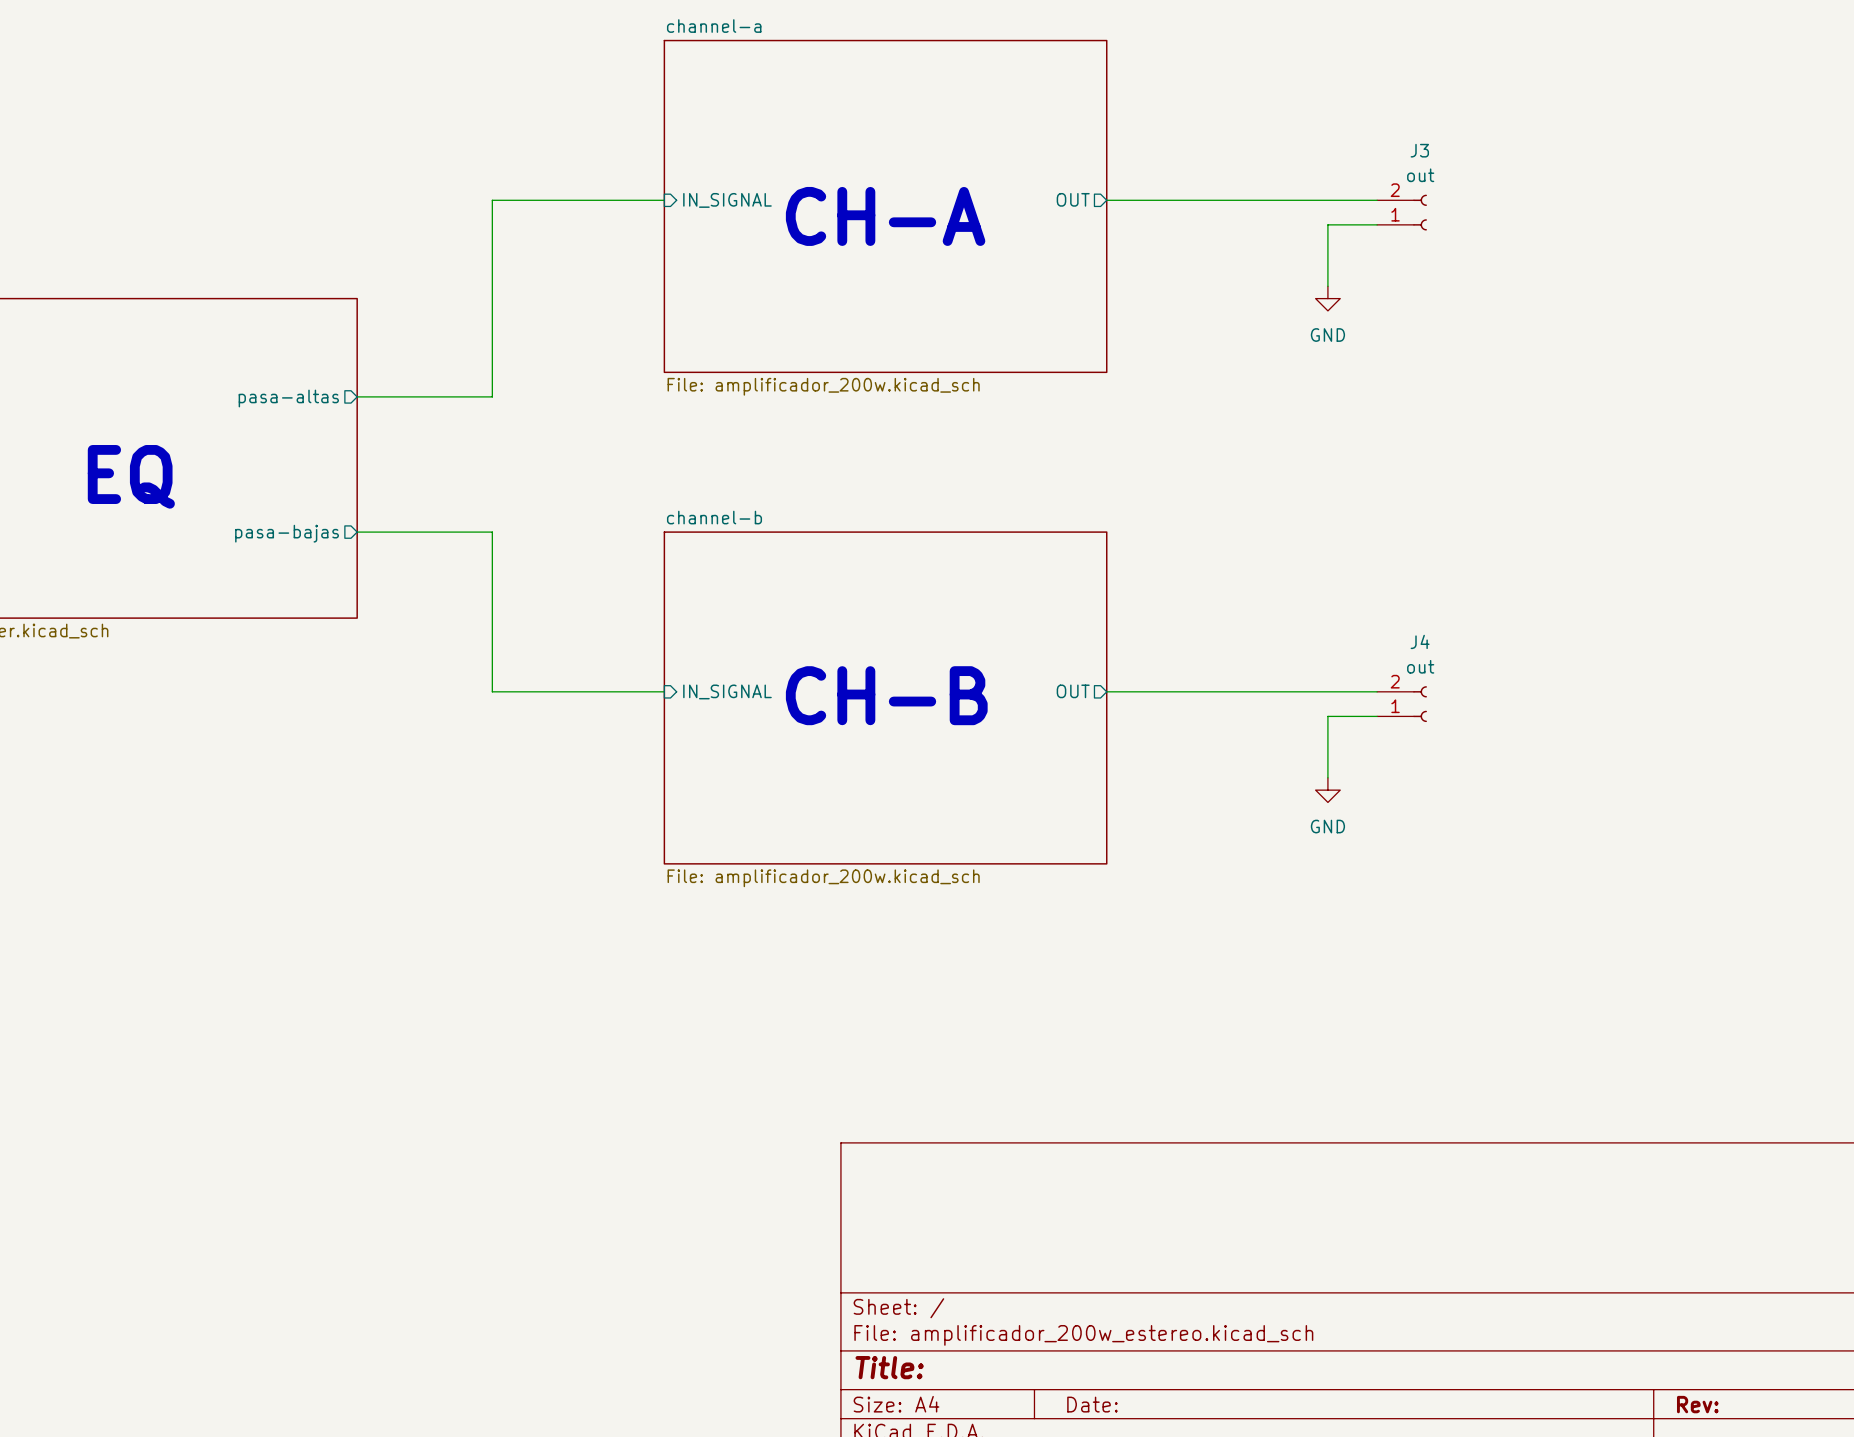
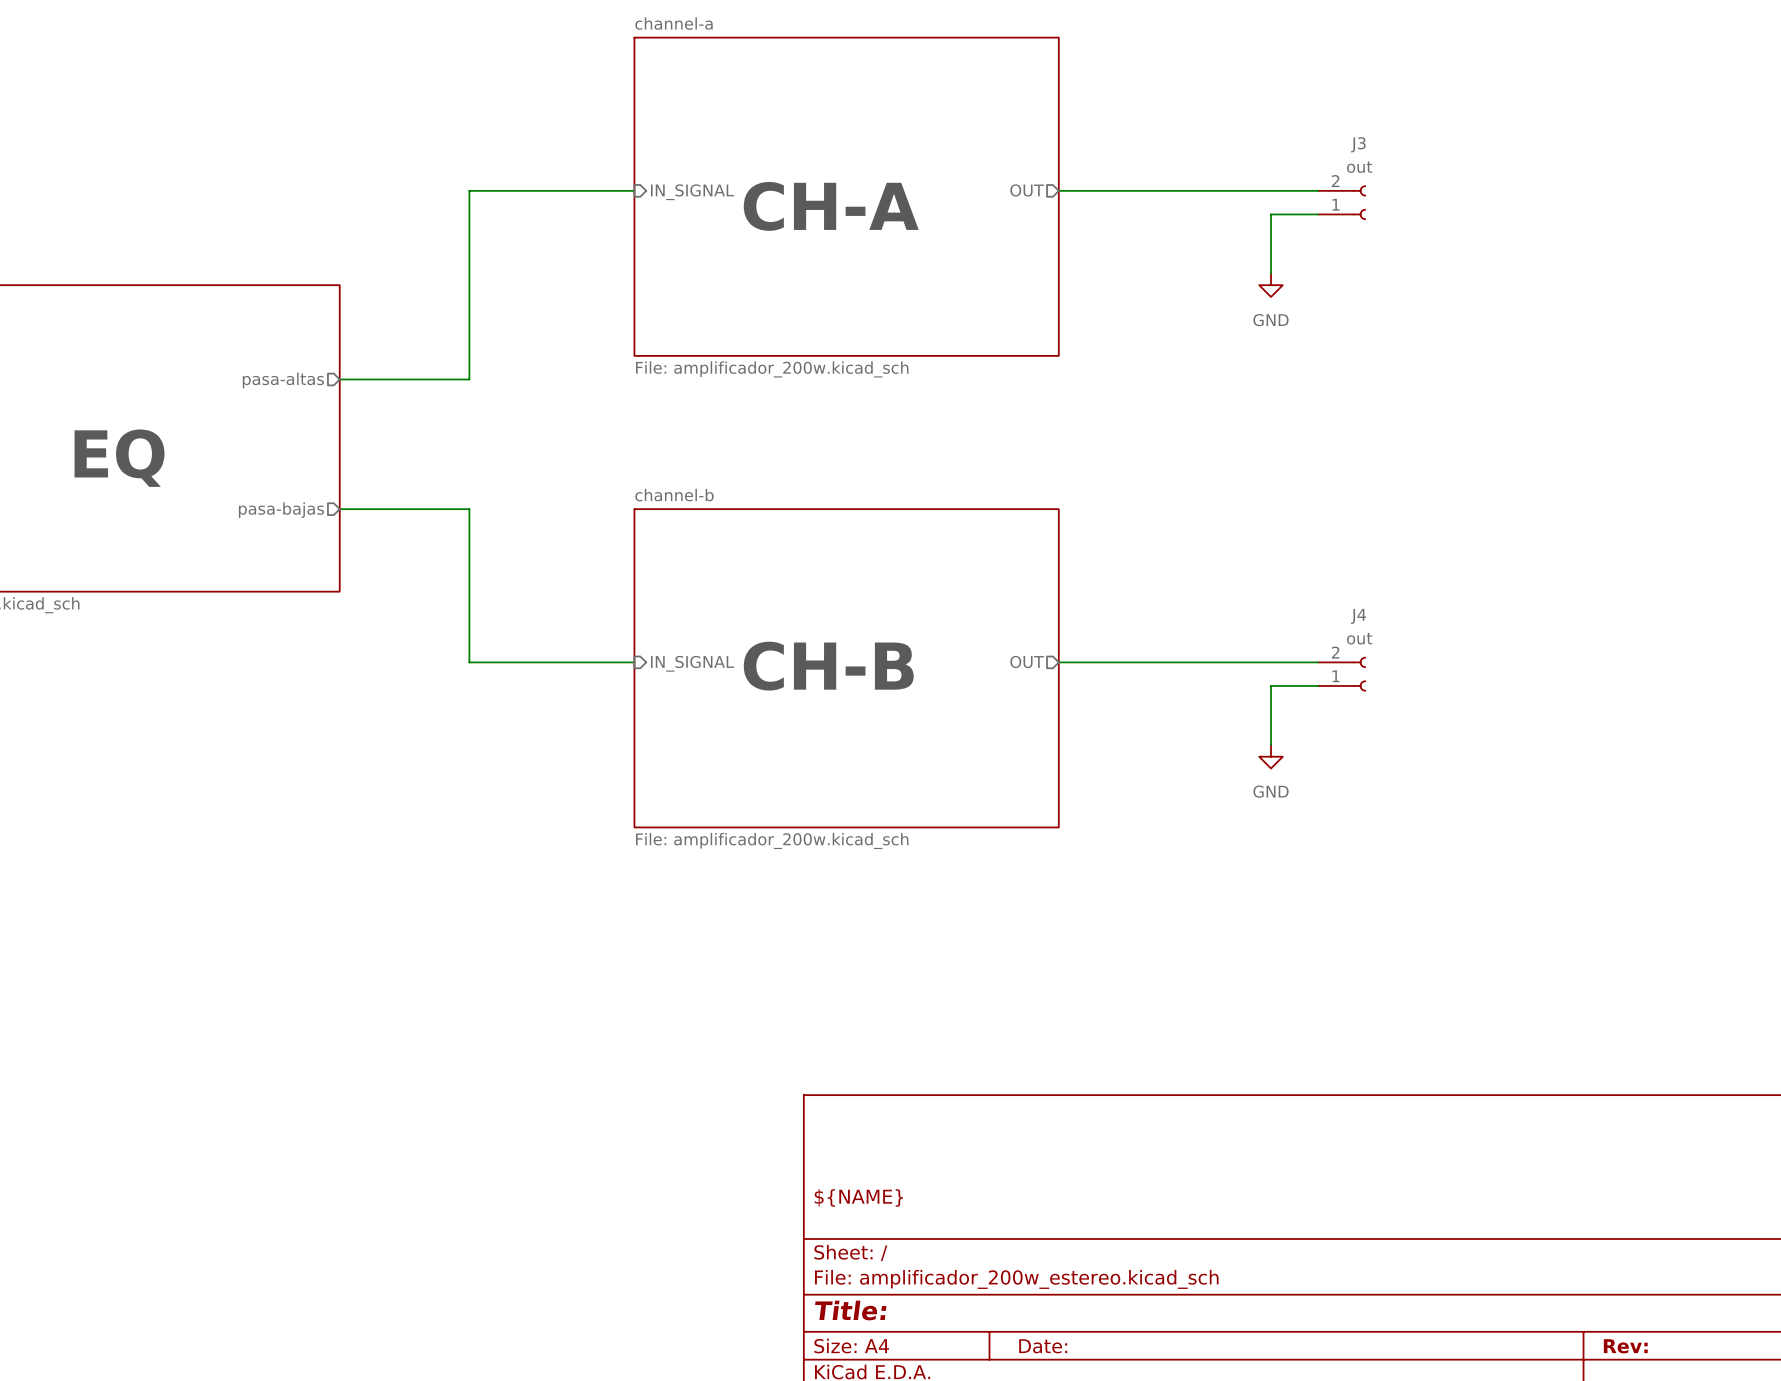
title block: none -> ${NAME} (858, 1197)

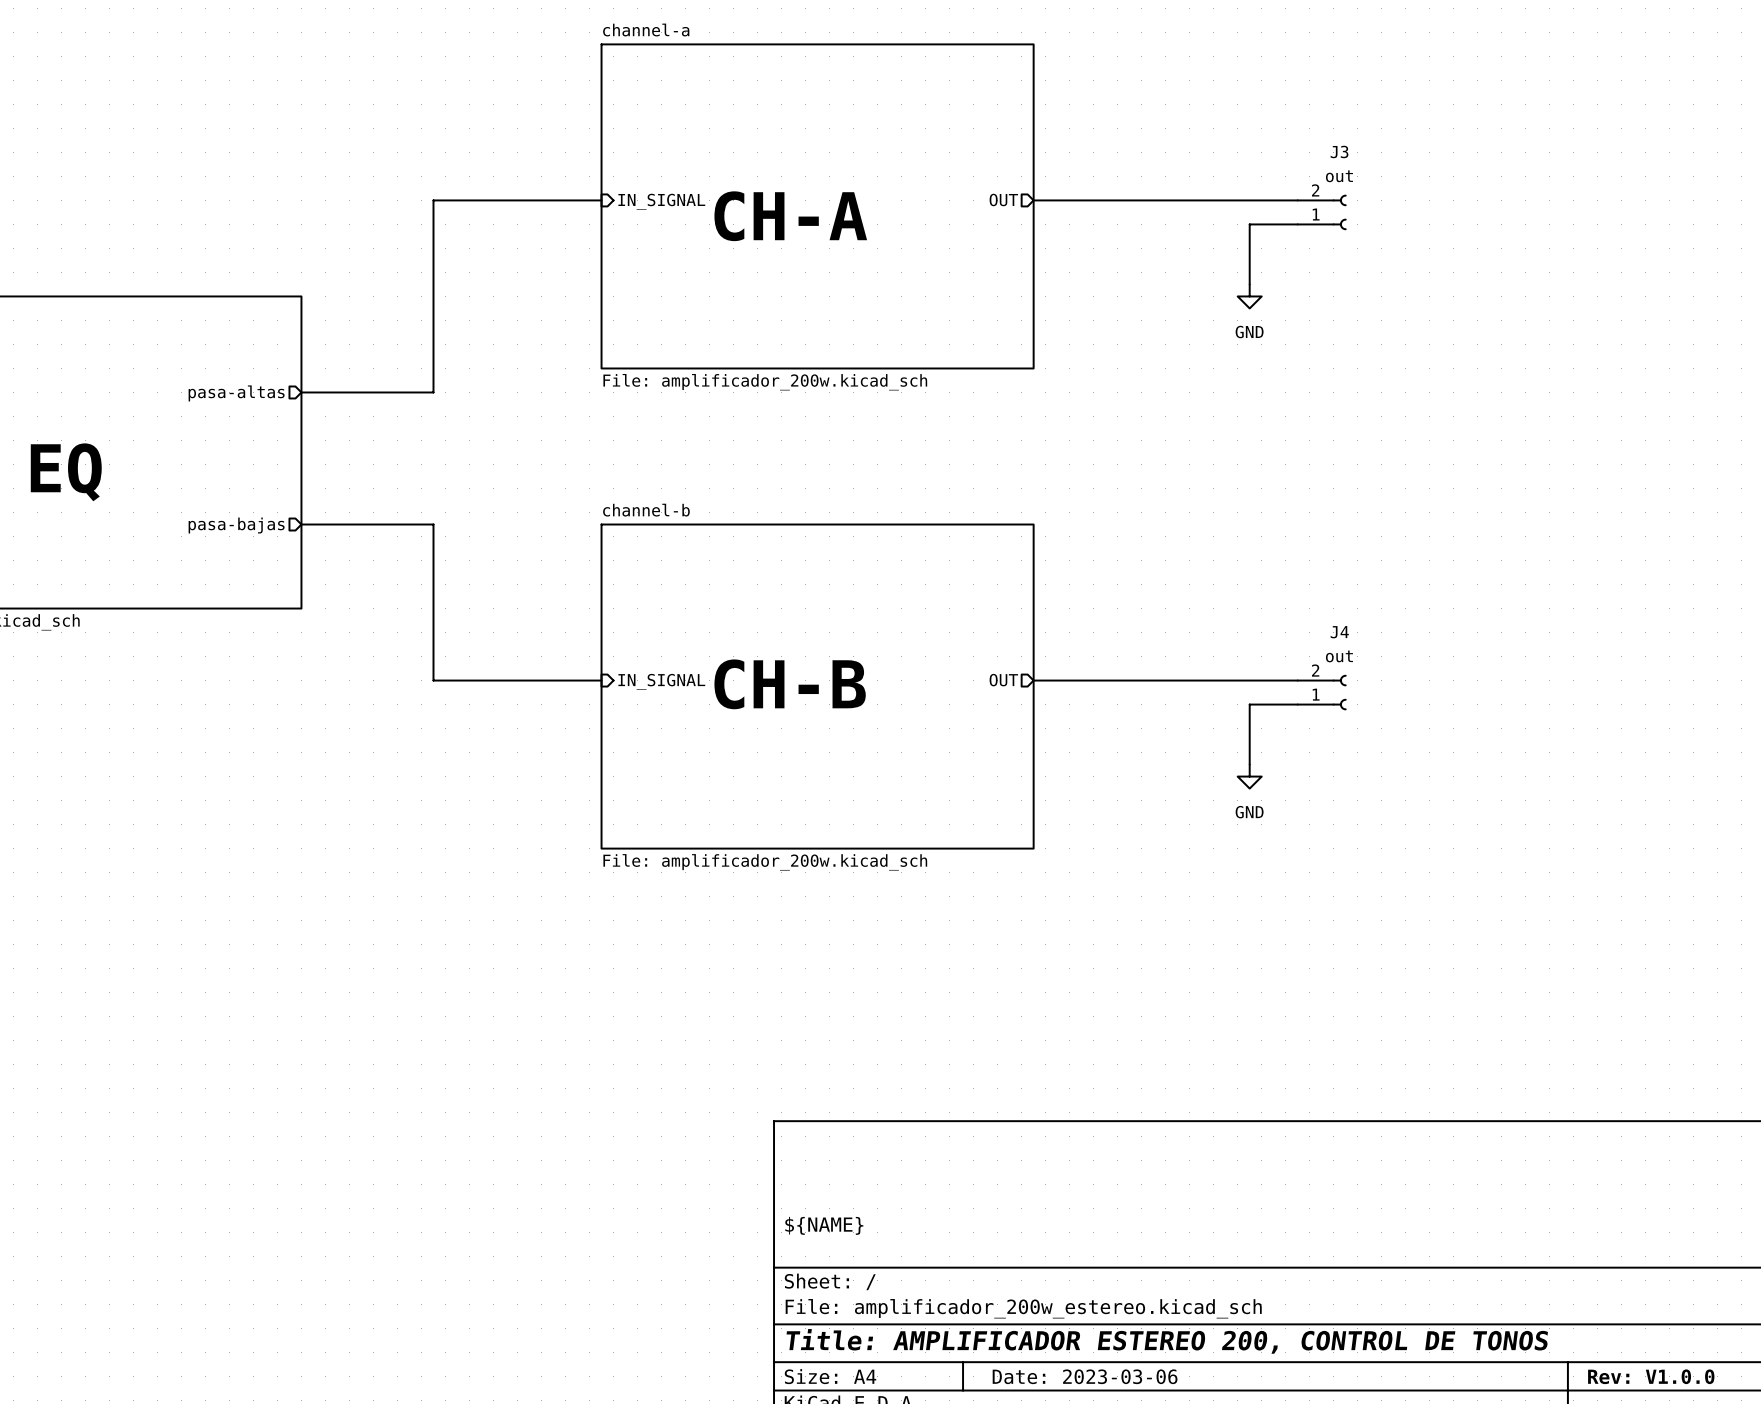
title block: Title: (850, 1310) -> Title: AMPLIFICADOR ESTEREO 200, CONTROL DE TONOS (1167, 1341)
title block: Date: (1043, 1346) -> Date: 2023-03-06 (1085, 1376)
title block: Rev: (1625, 1346) -> Rev: V1.0.0 (1651, 1376)

